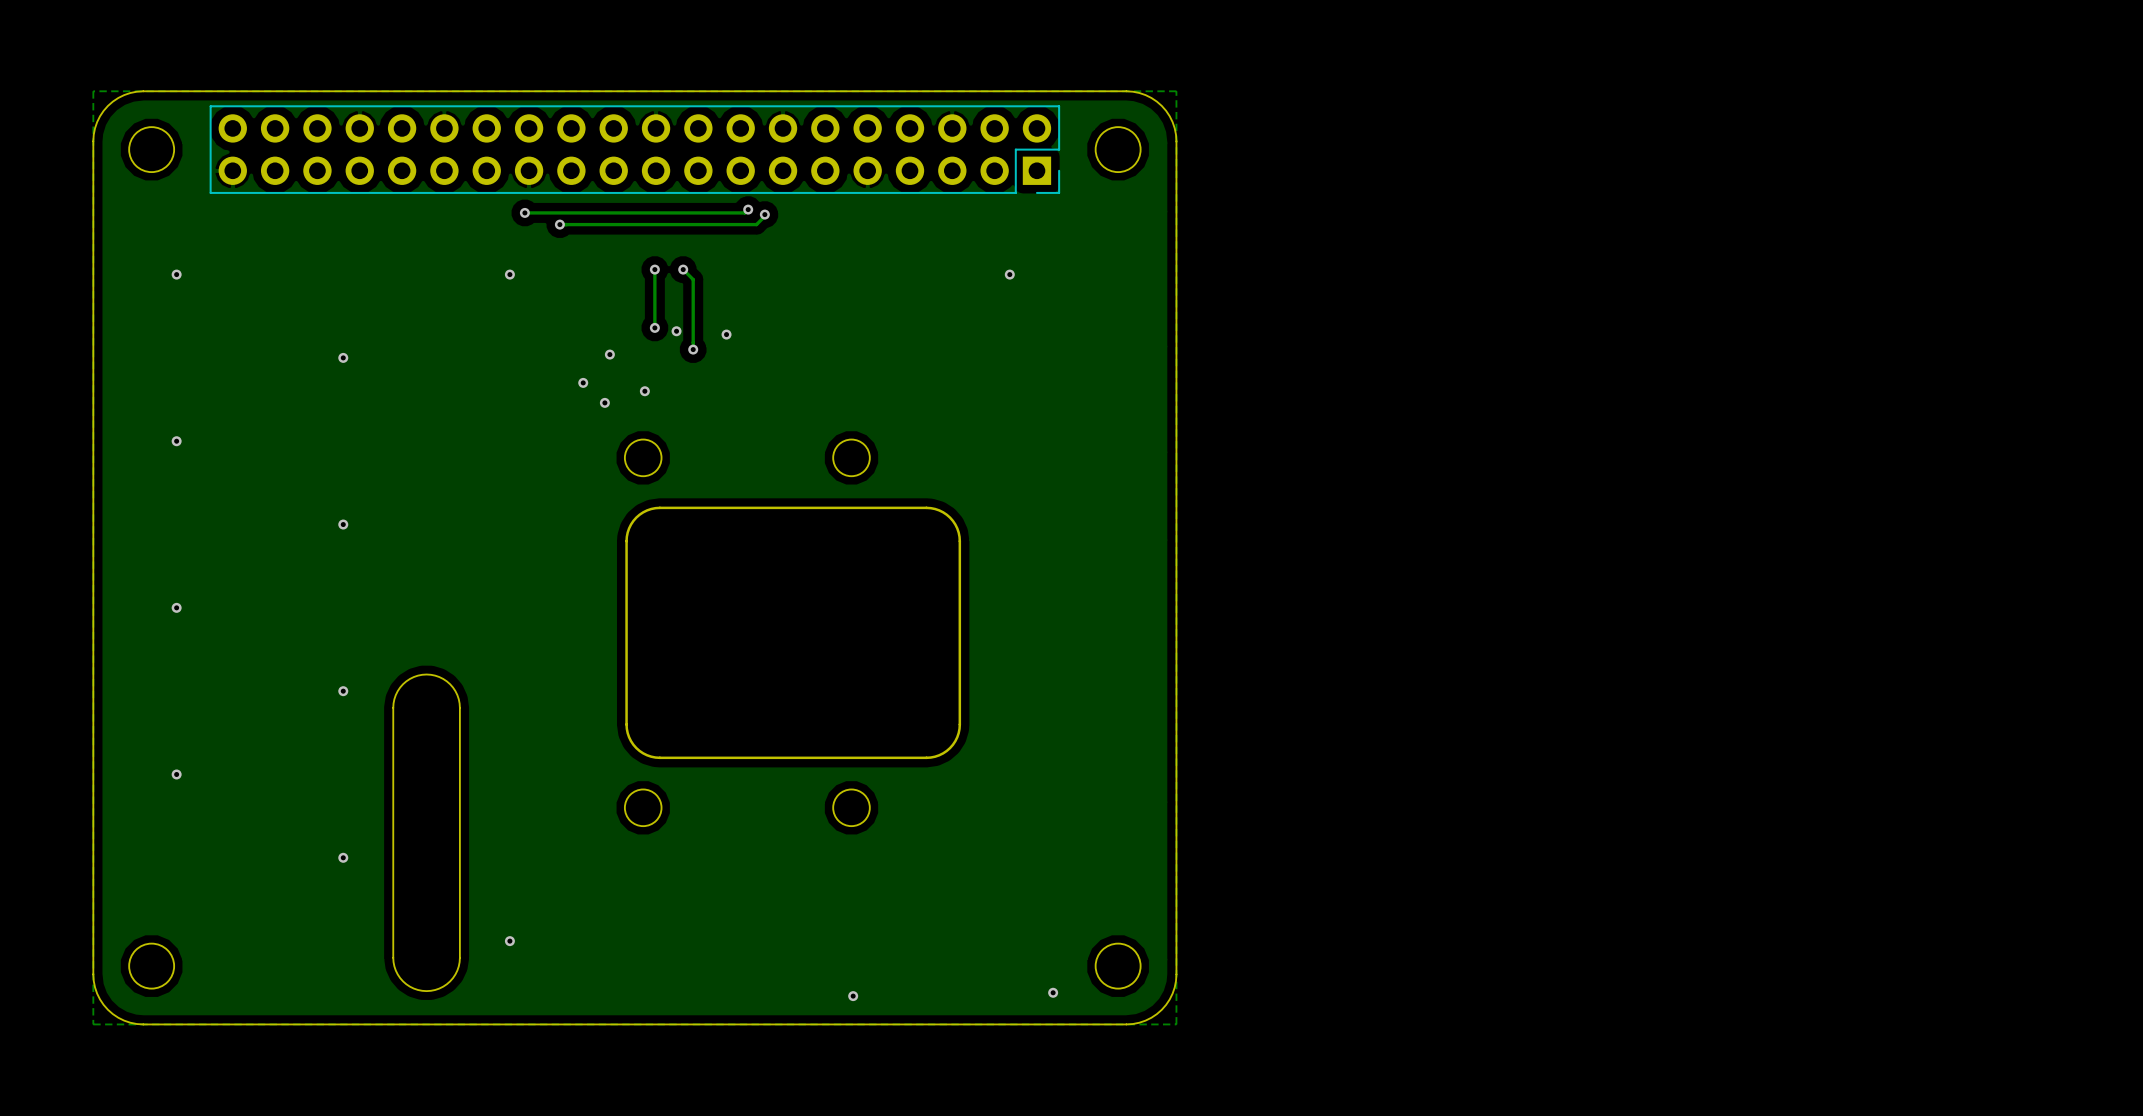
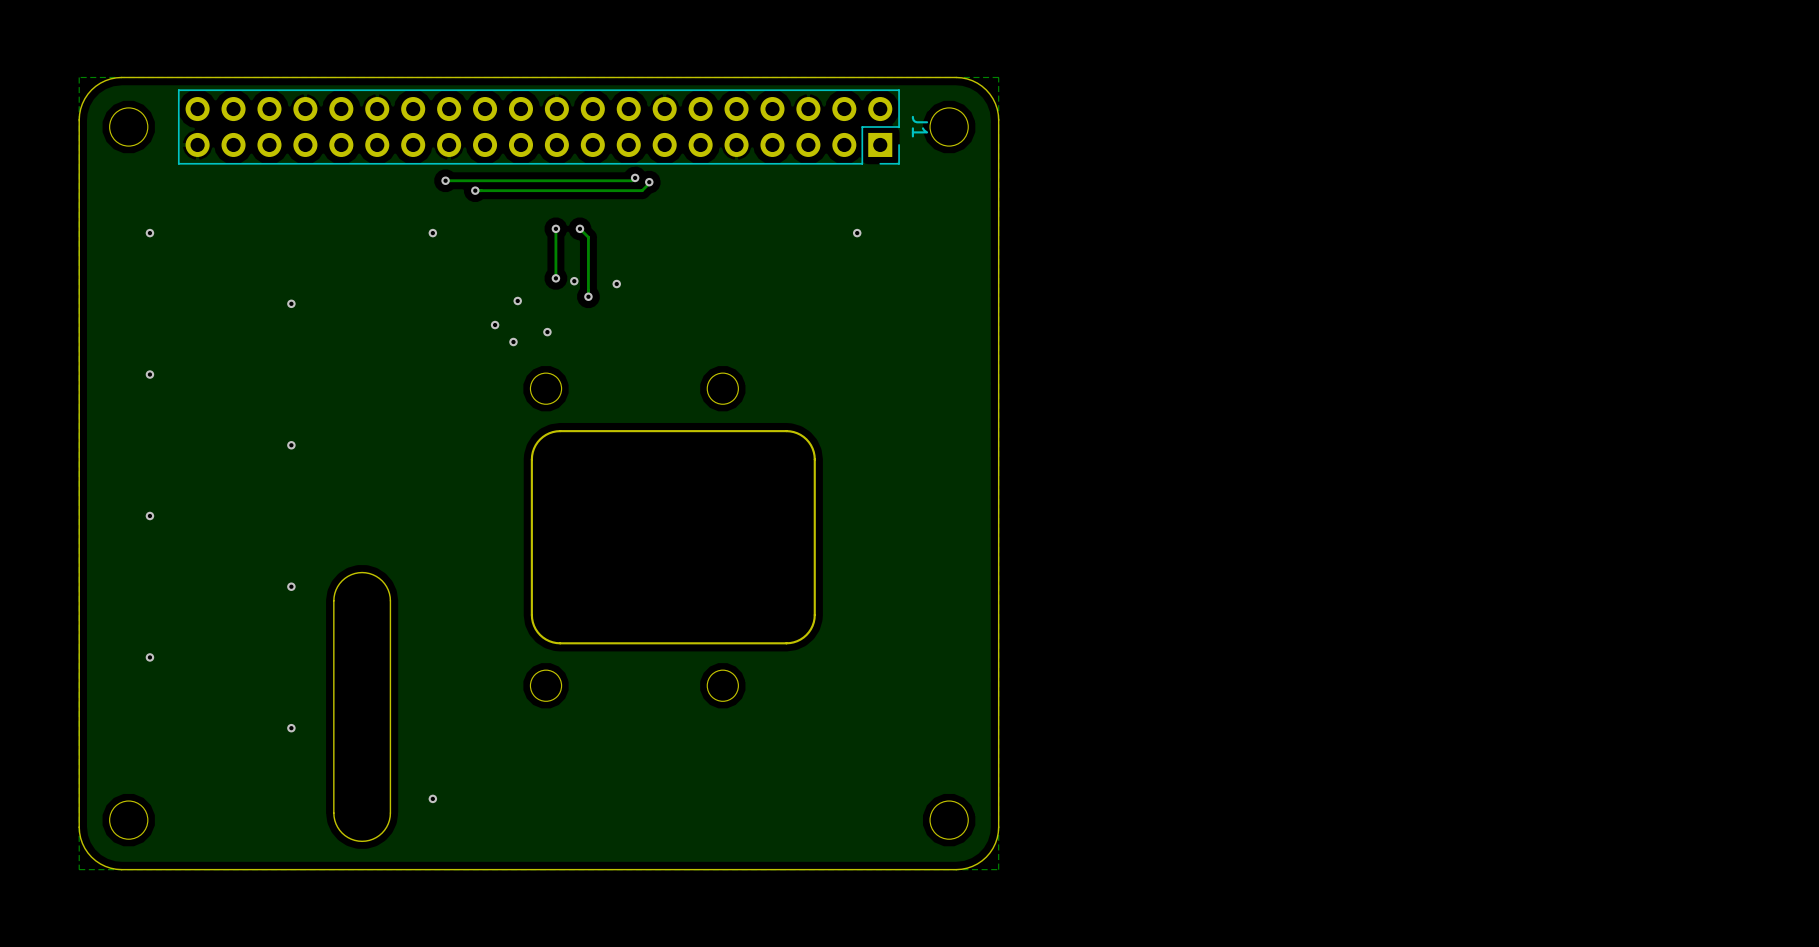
J1 name: none -> J1 (919, 126)
via: (1053, 992) -> none
via: (853, 996) -> none

